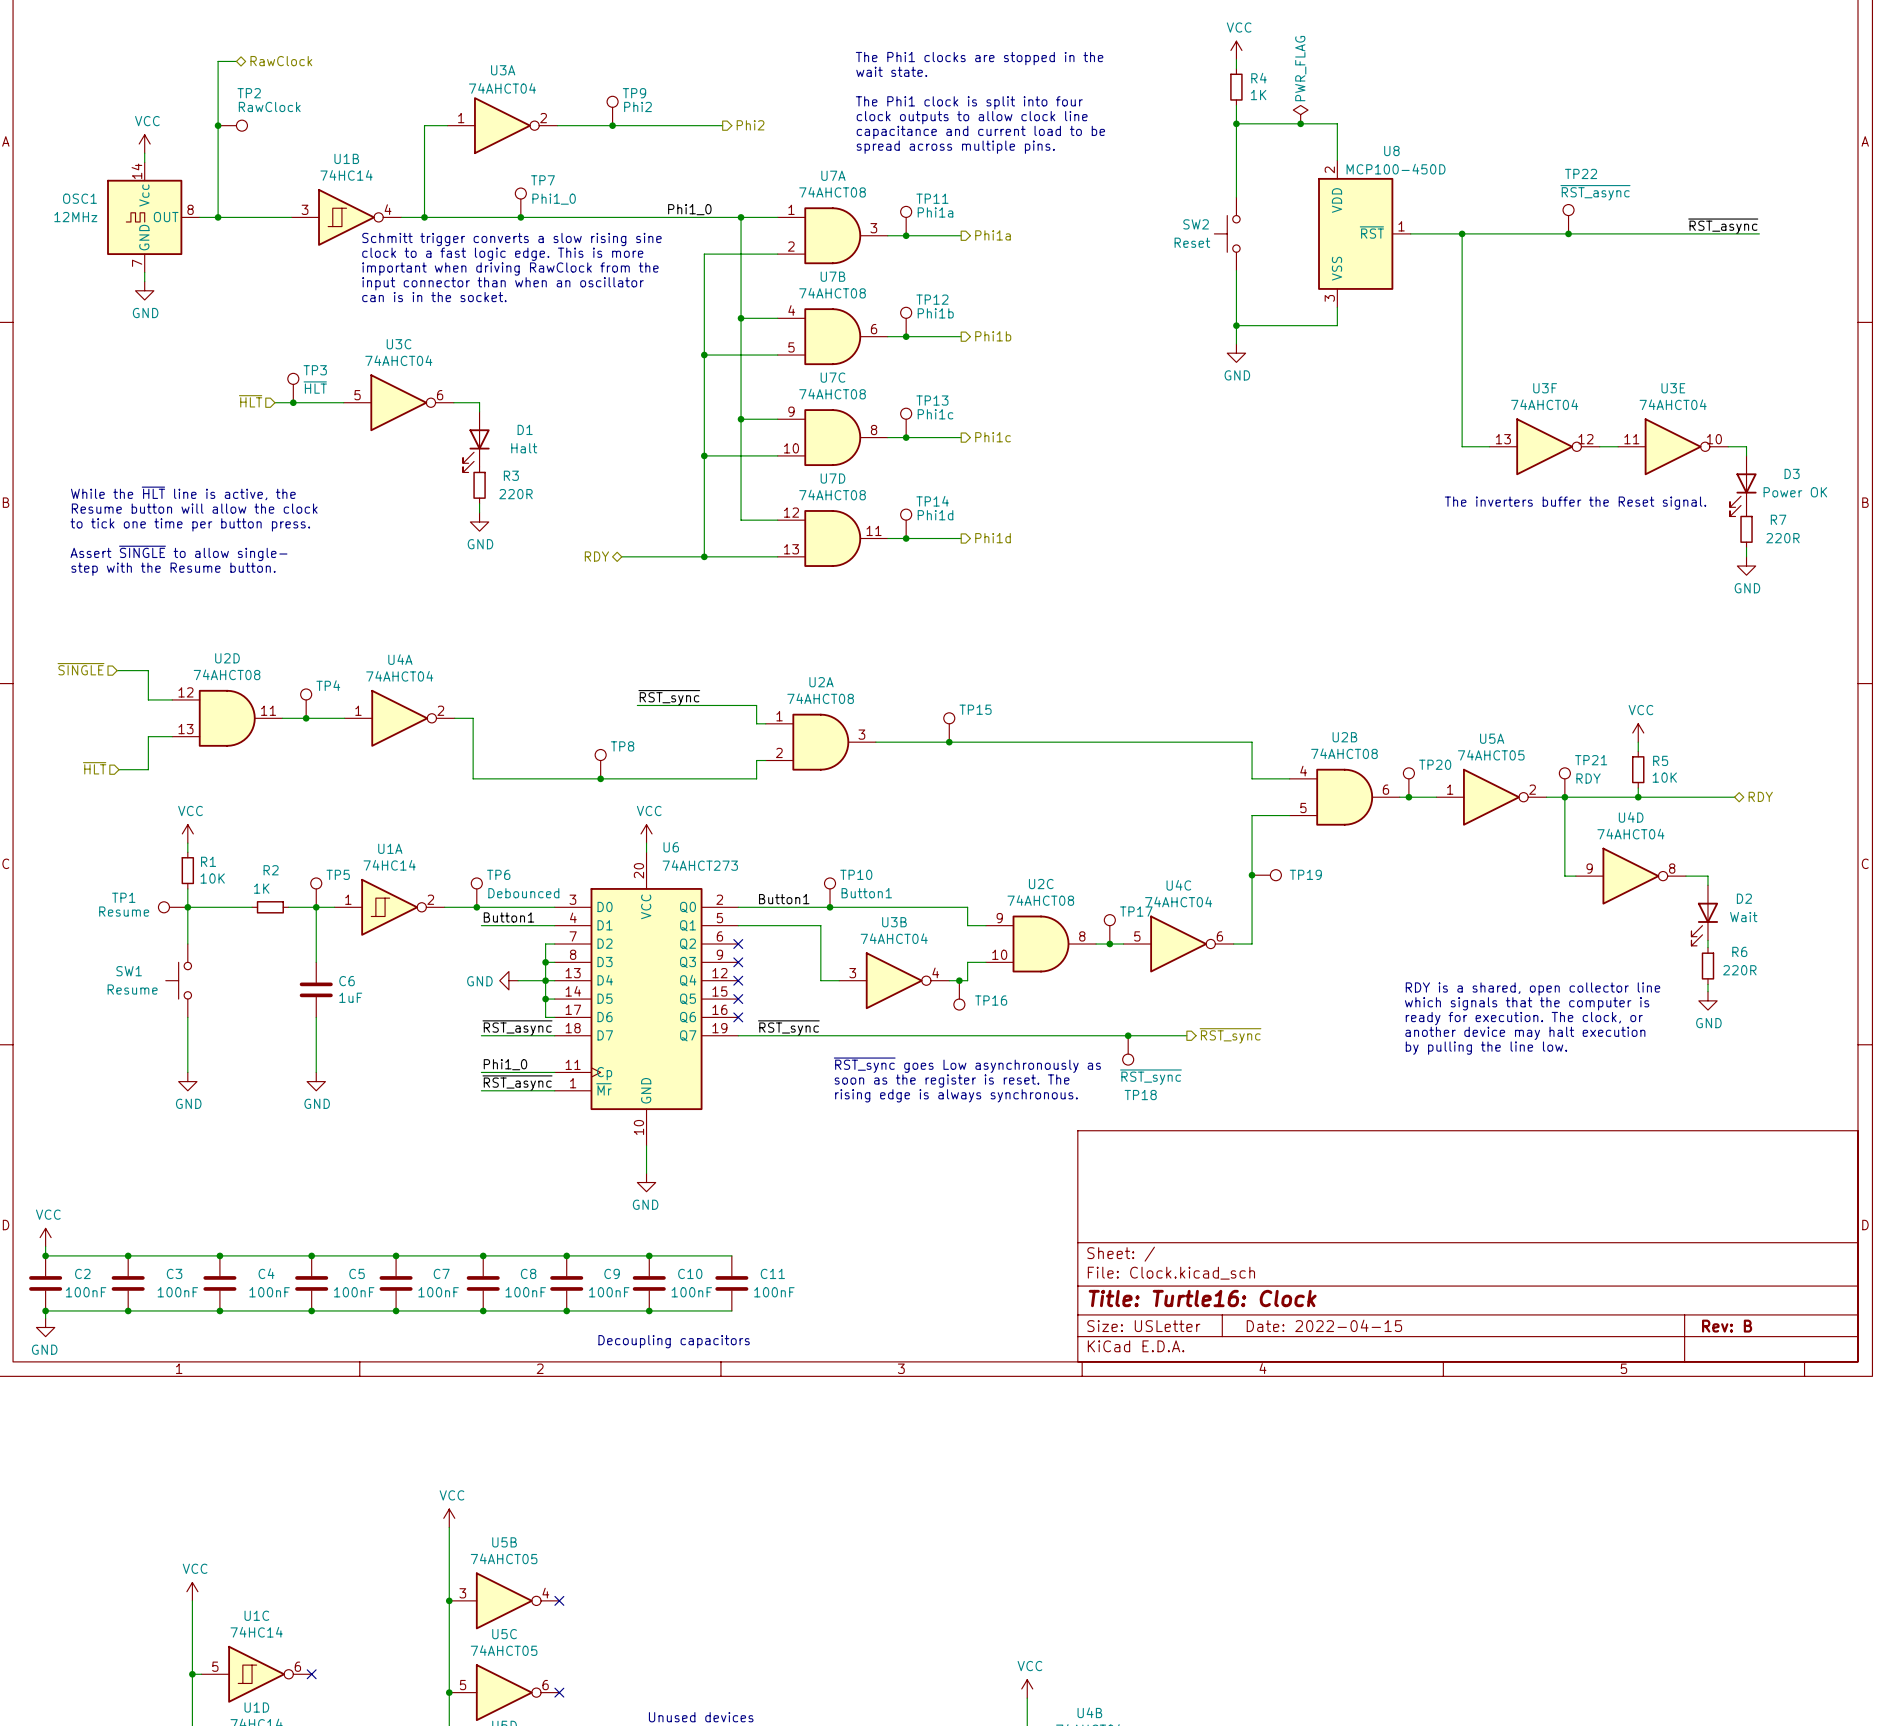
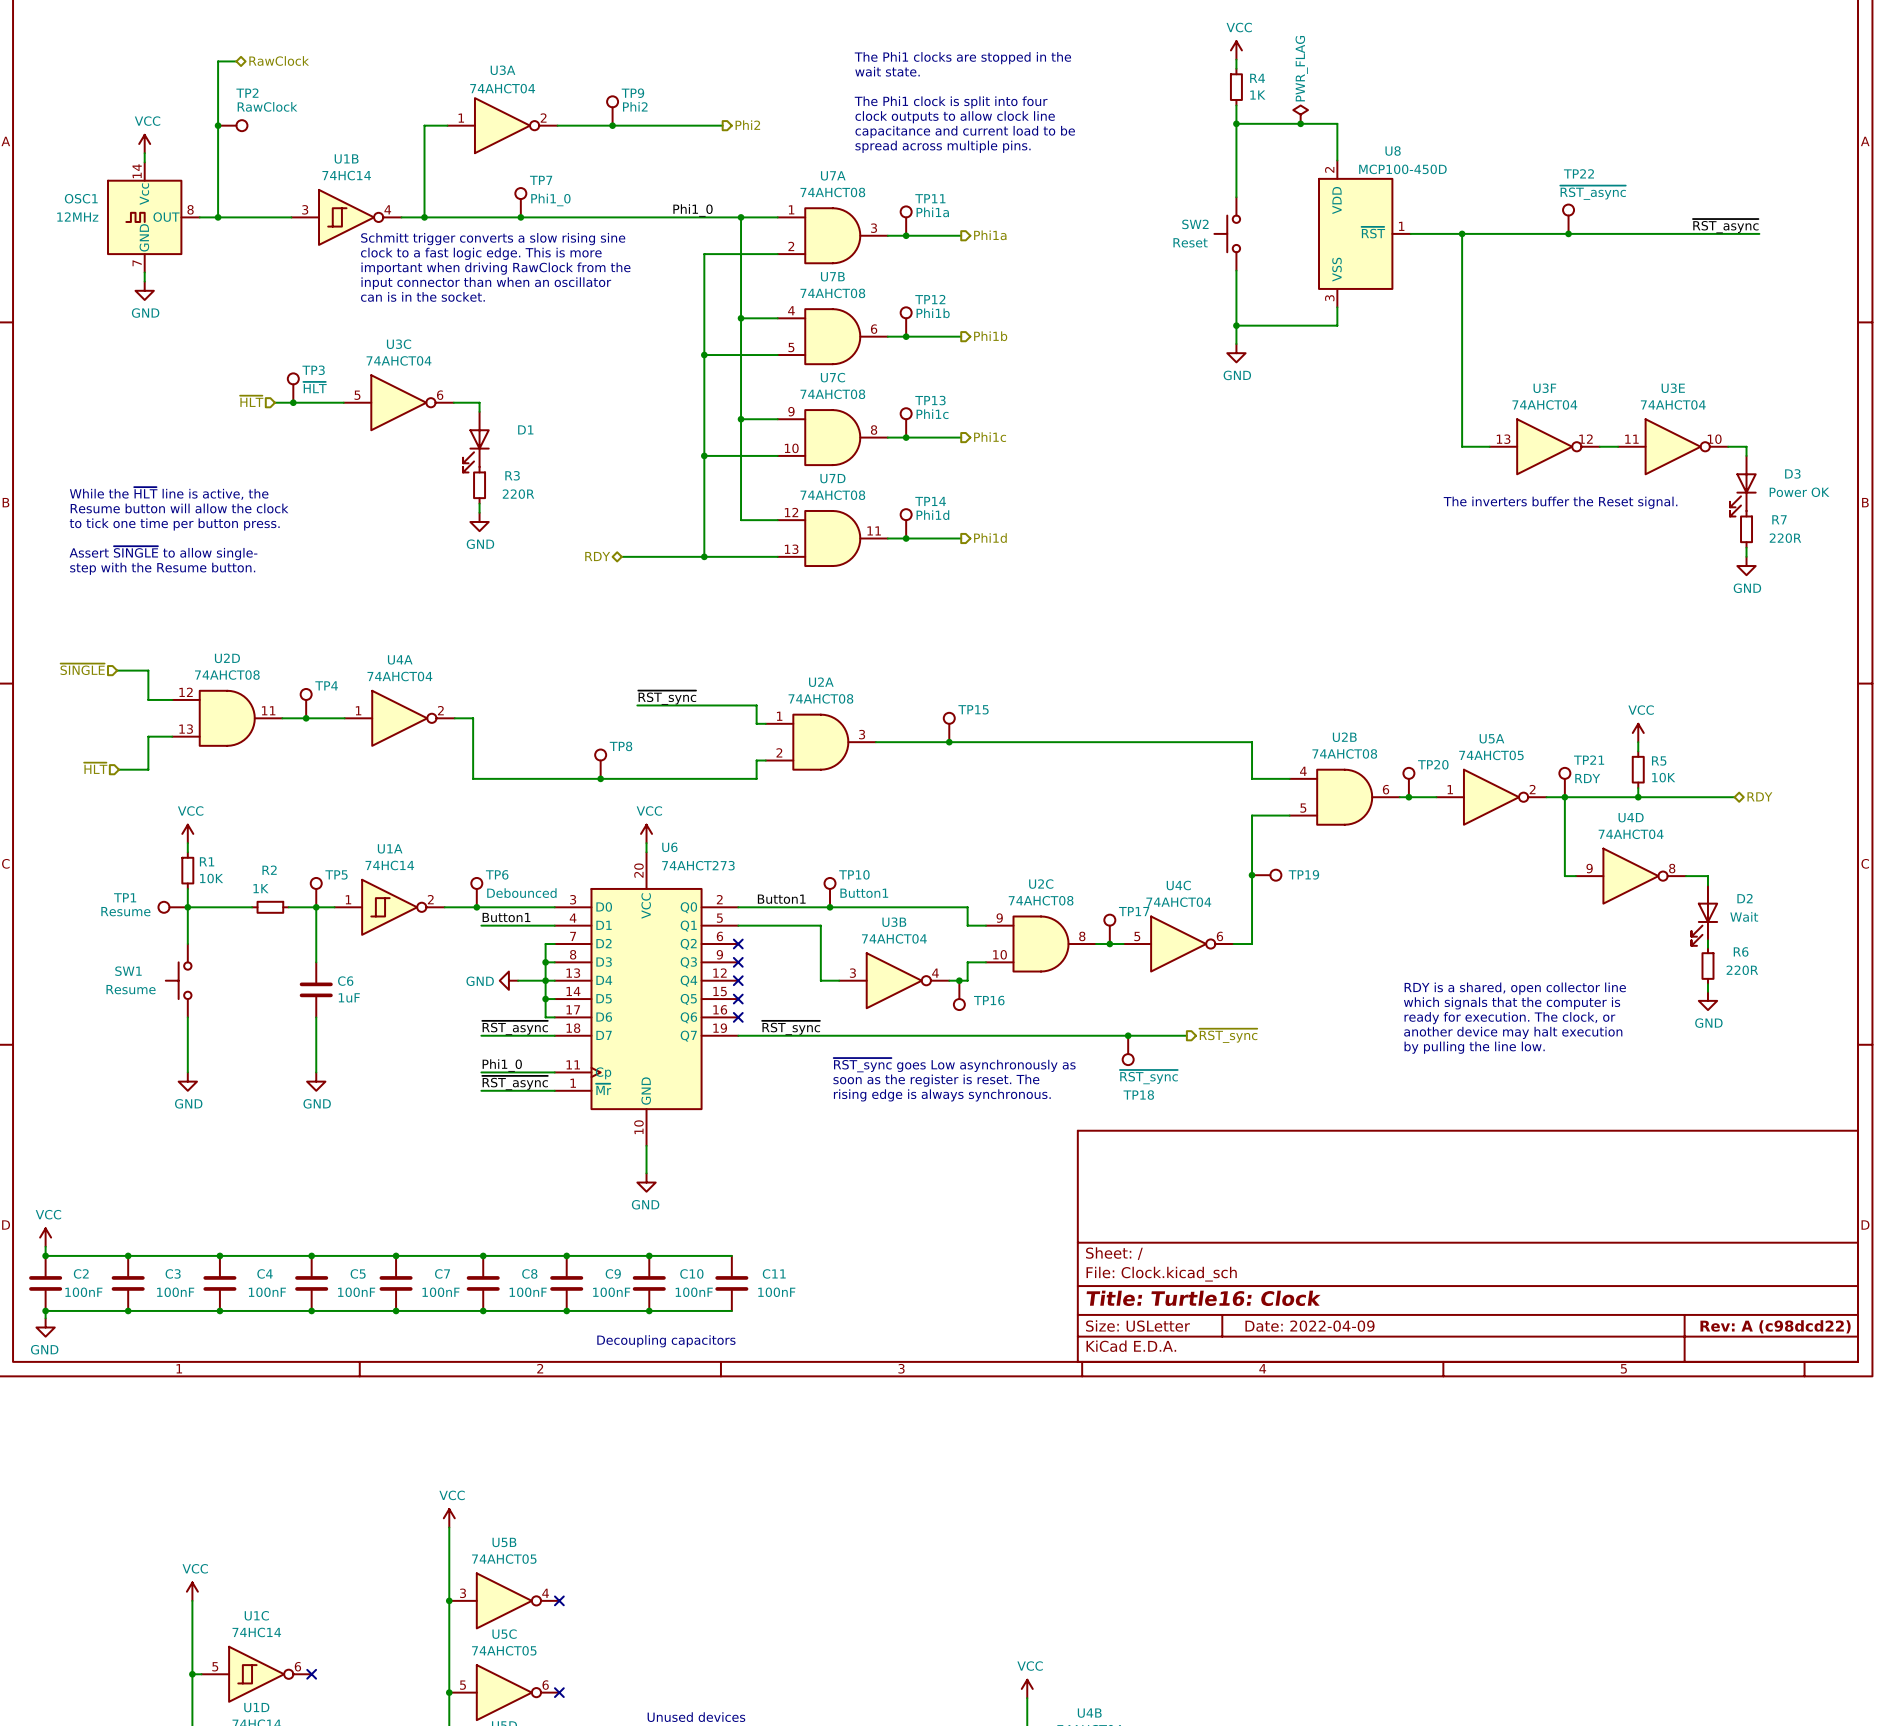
D1 value: Halt (524, 448) -> none
title block: Date: 2022-04-15 (1324, 1325) -> Date: 2022-04-09 (1309, 1326)
title block: Rev: B (1727, 1326) -> Rev: A (c98dcd22) (1775, 1326)

